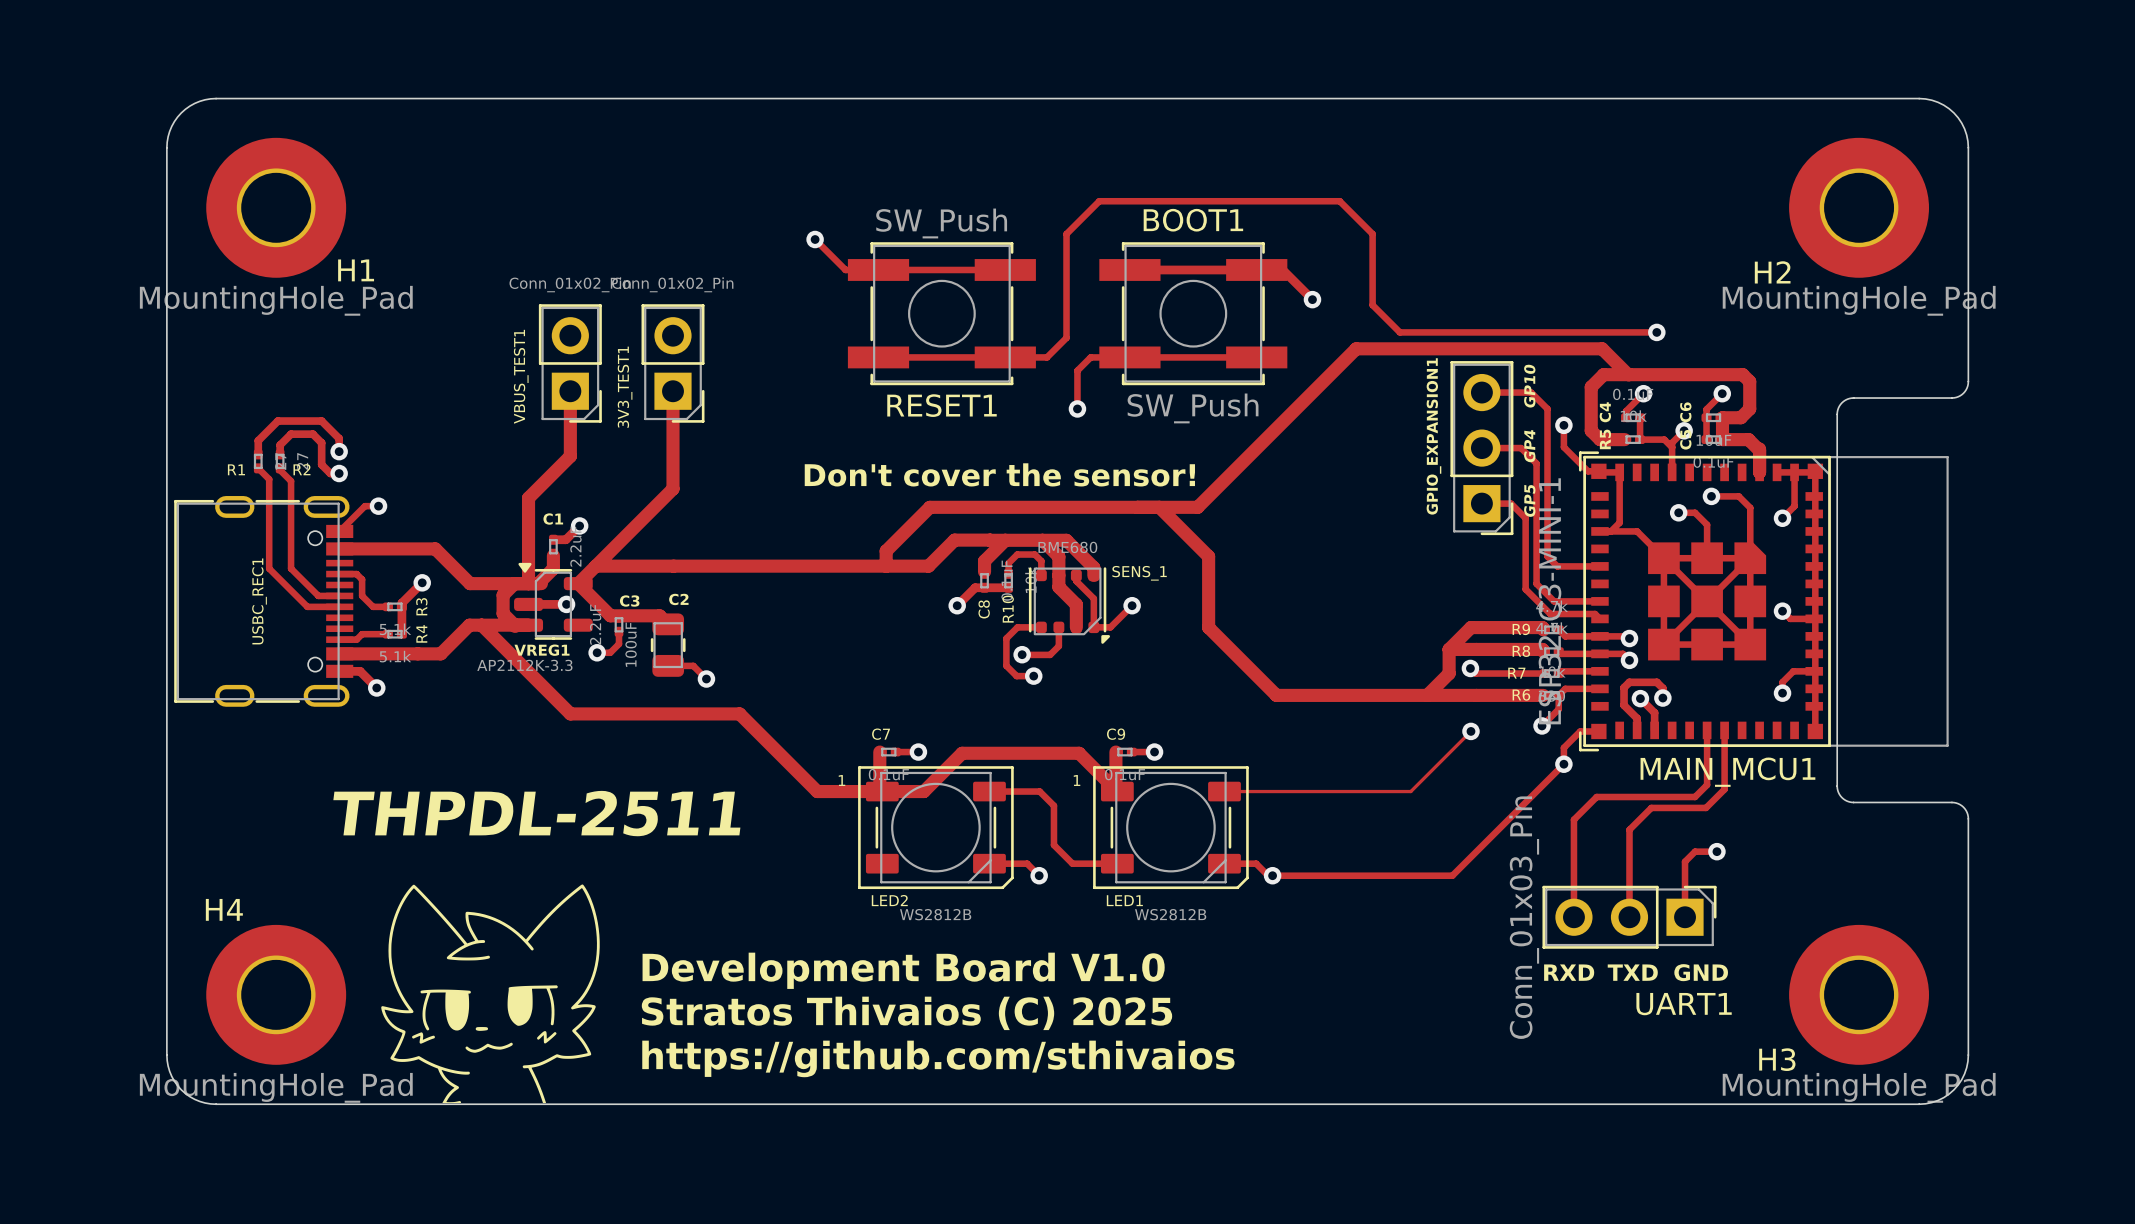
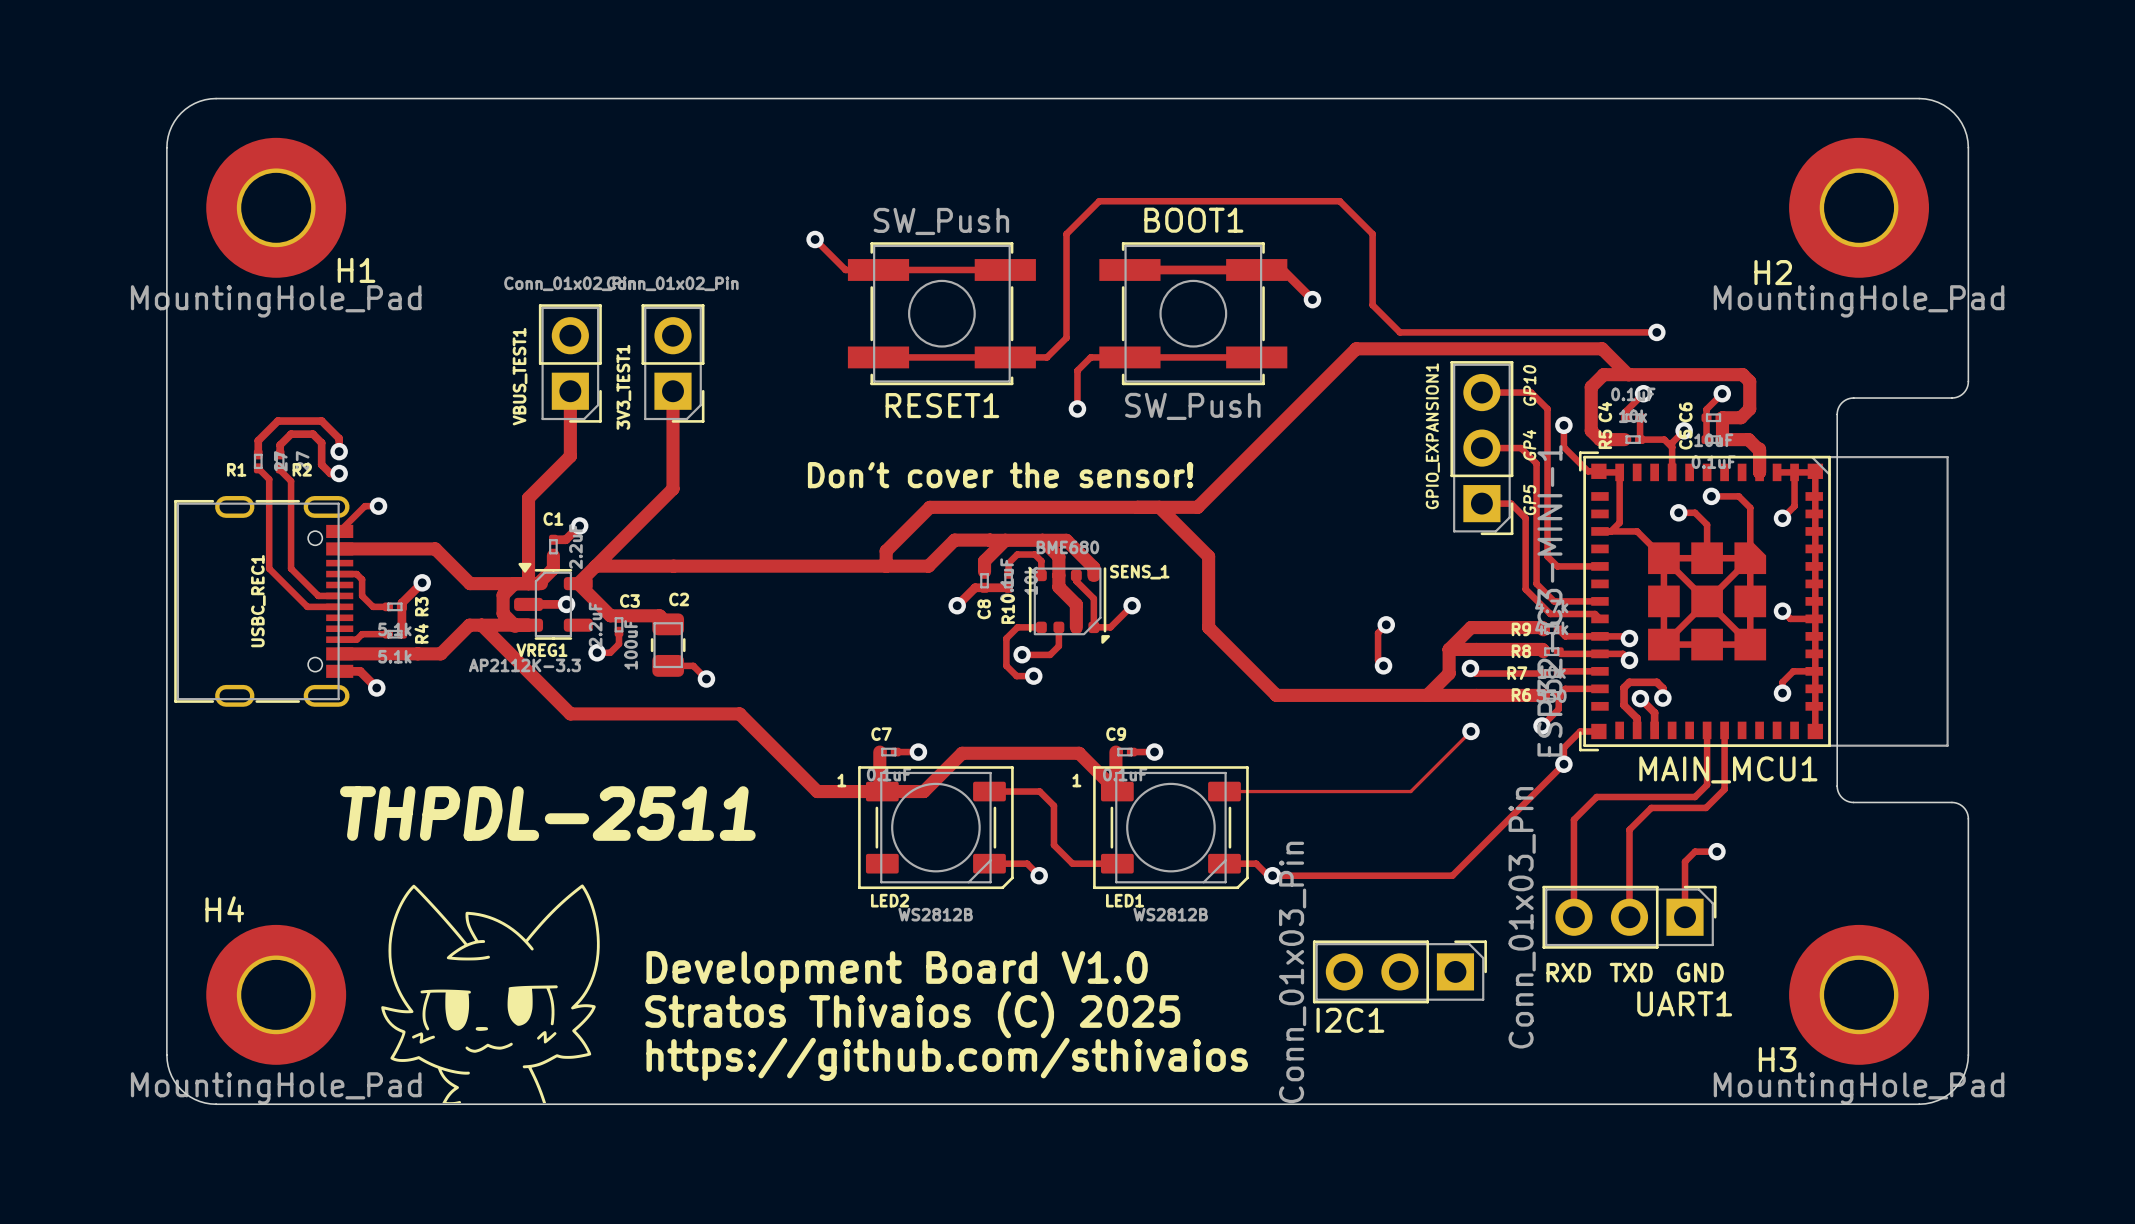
track: none -> (1386, 624) (1378, 633) (1378, 660) (1383, 665)
via: none -> (1386, 624)
via: none -> (1383, 665)
I2C1: none -> Conn_01x03_Pin (1399, 971)

